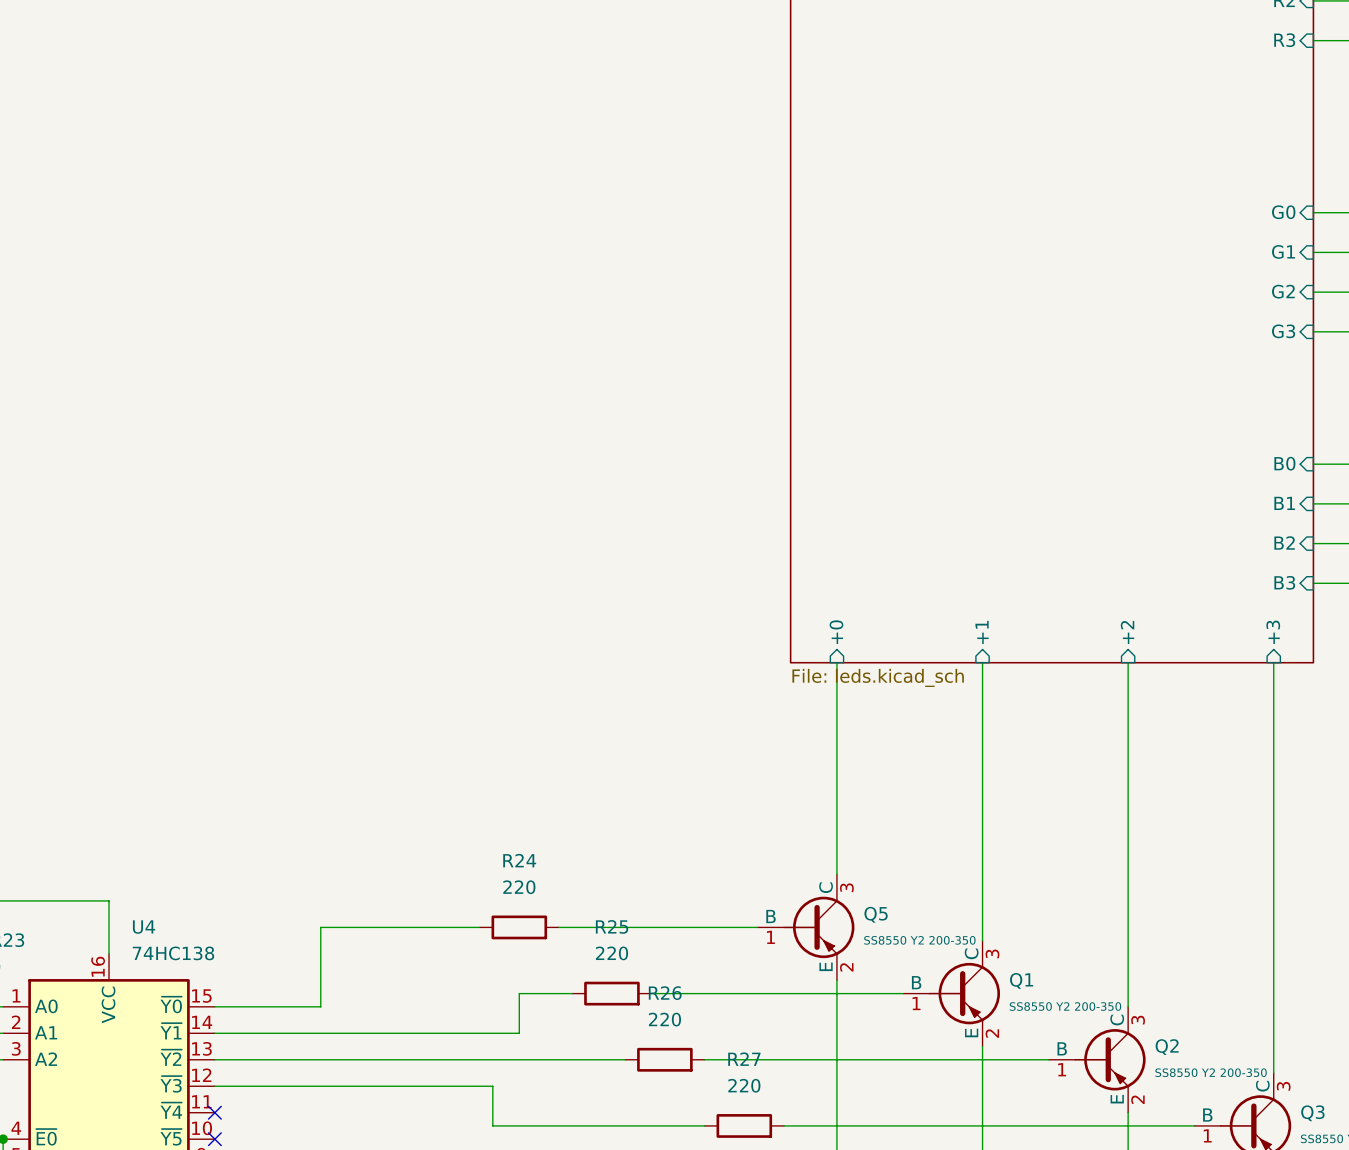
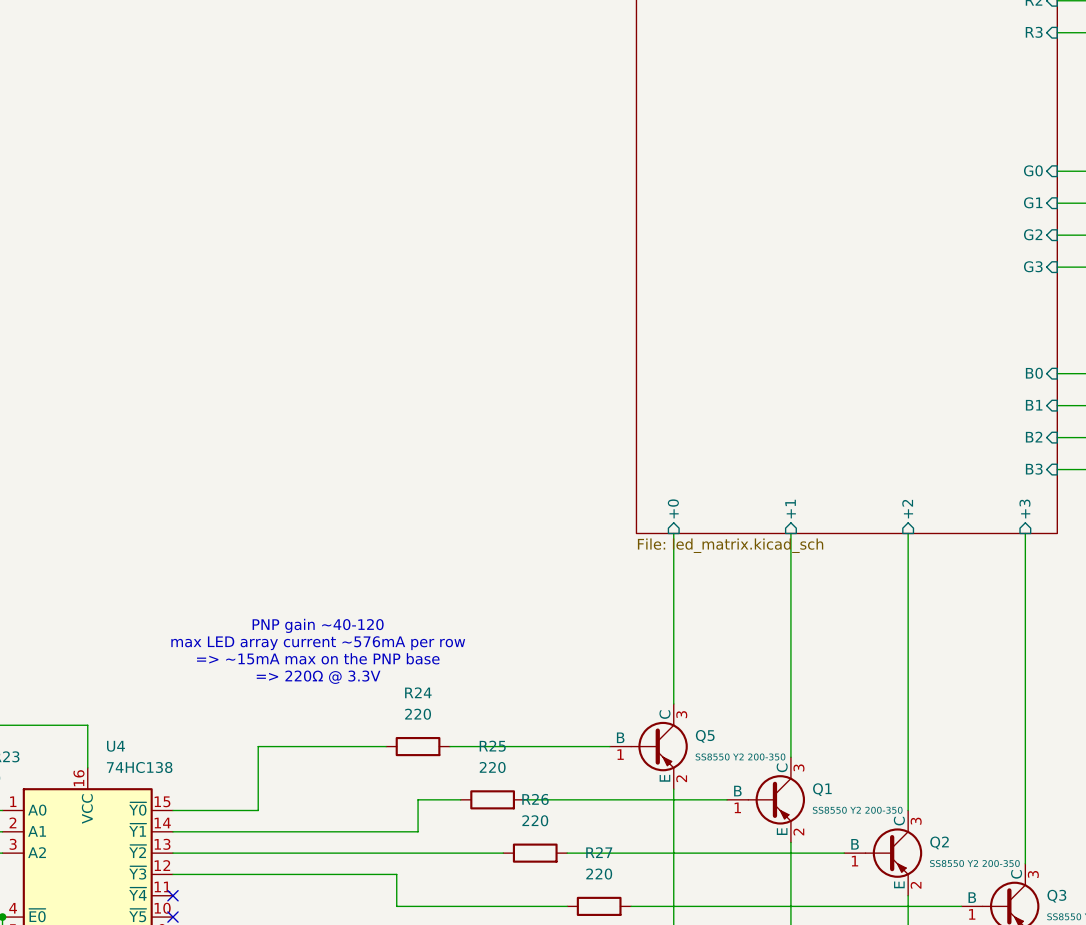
sheet value: File: leds.kicad_sch (878, 677) -> File: led_matrix.kicad_sch (730, 545)
text: none -> PNP gain ~40-120 (318, 625)
text: none -> max LED array current ~576mA per row (318, 643)
text: none -> => ~15mA max on the PNP base (318, 658)
text: none -> => 220Ω @ 3.3V (318, 677)

